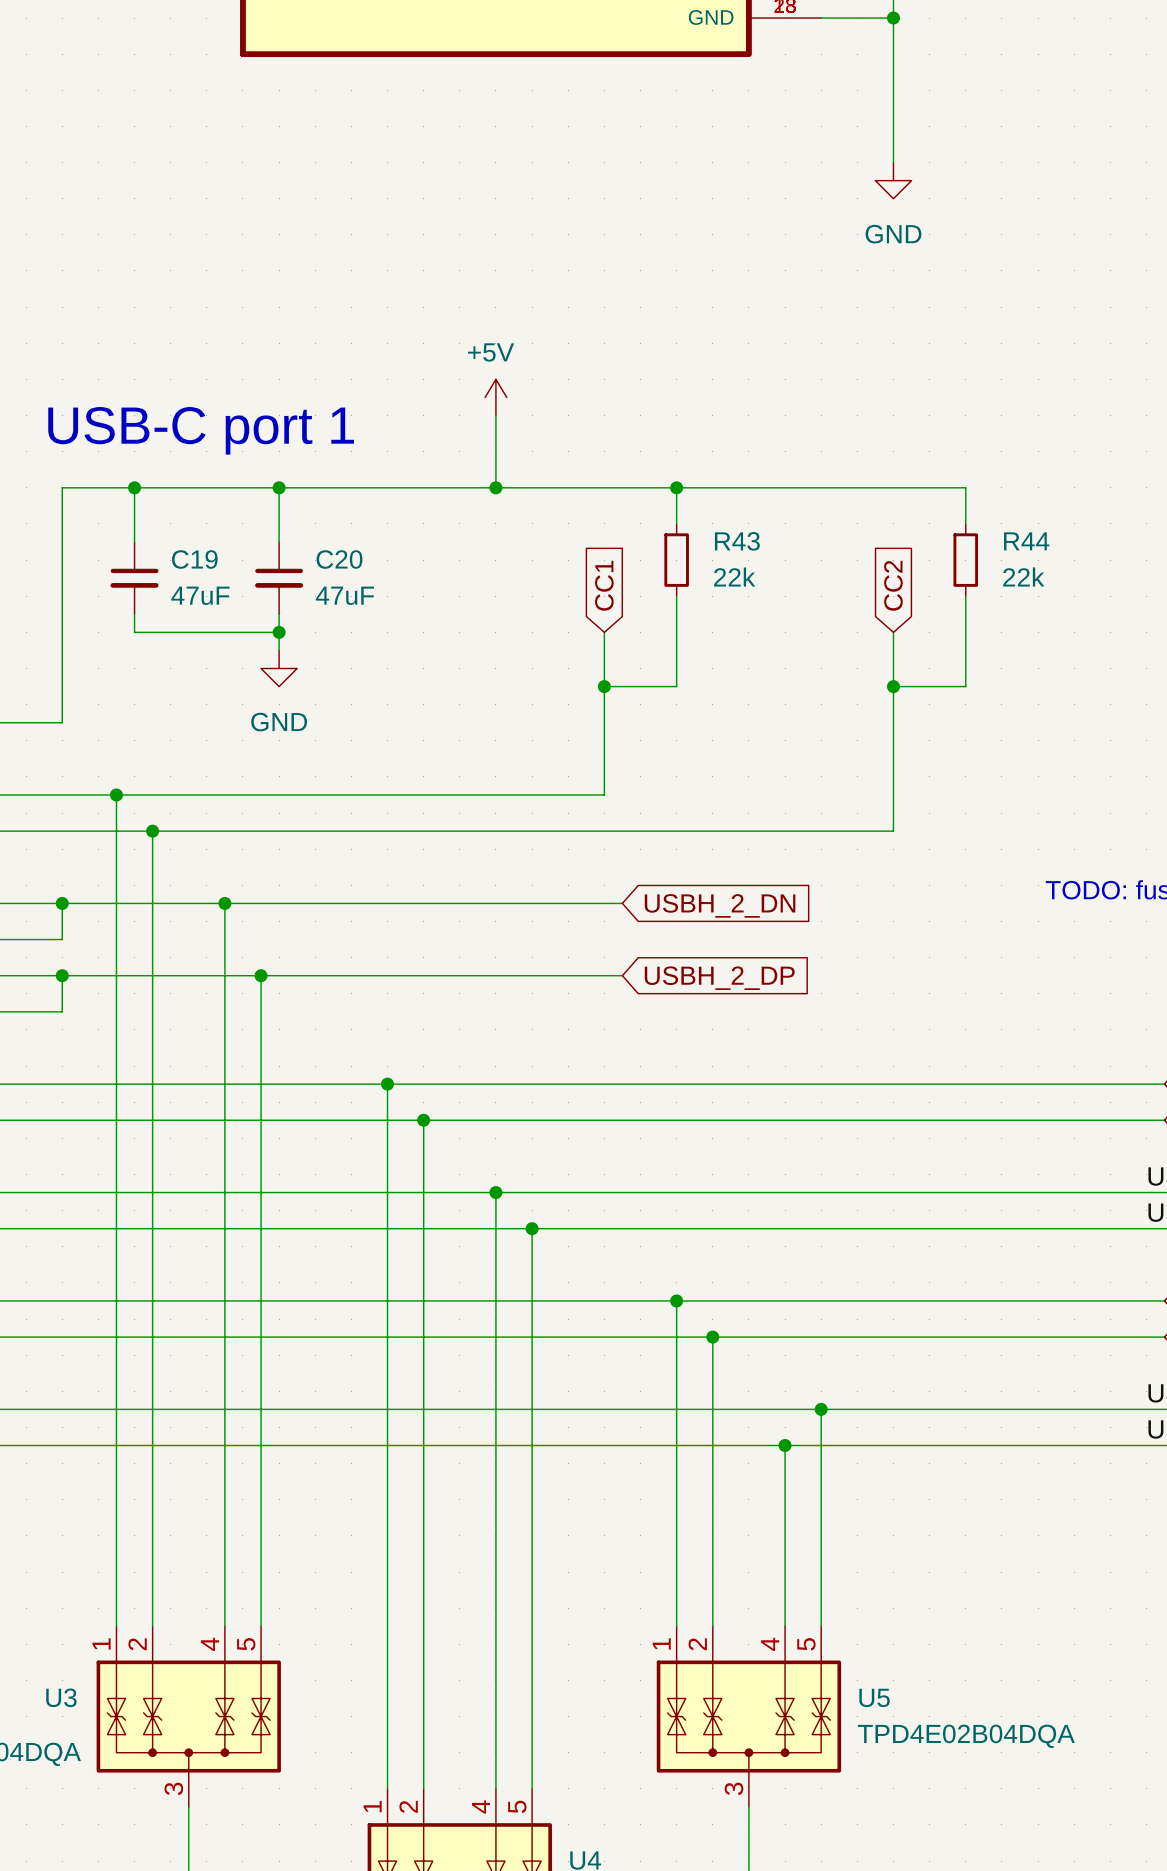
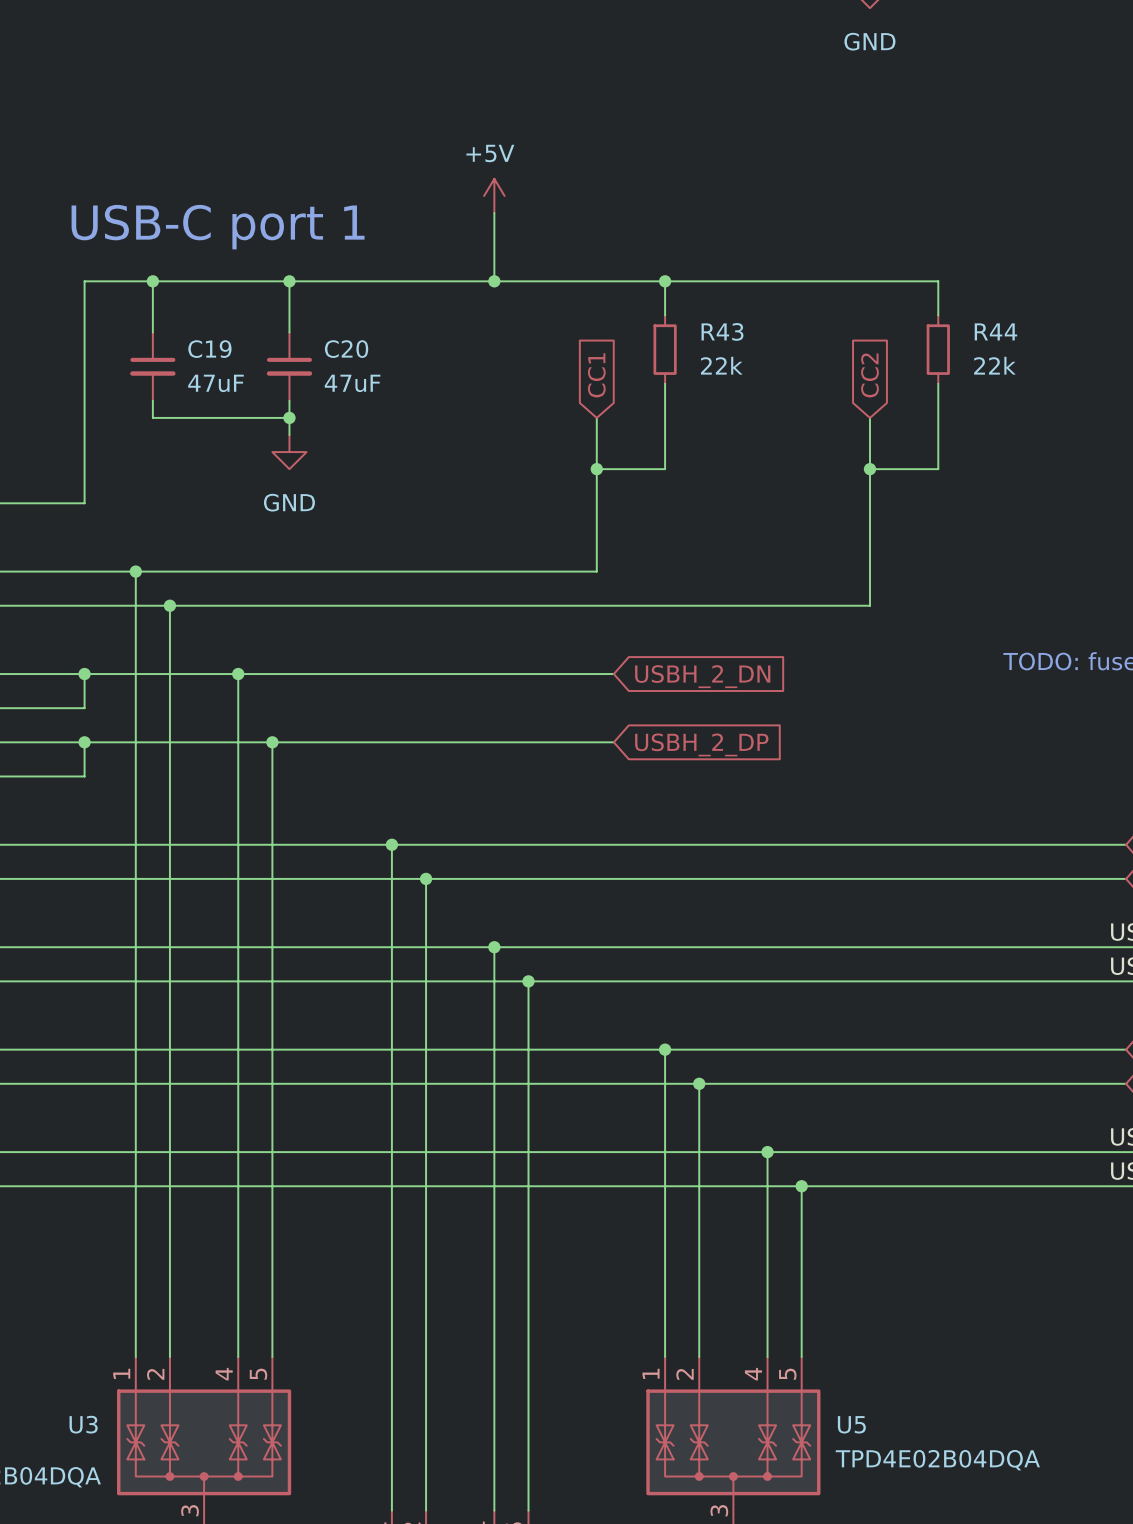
junction: none -> (767, 1152)
wire: (821, 1409) (821, 1445) -> (767, 1152) (767, 1186)
junction: (821, 1409) -> none
junction: (785, 1445) -> none
junction: none -> (801, 1186)

